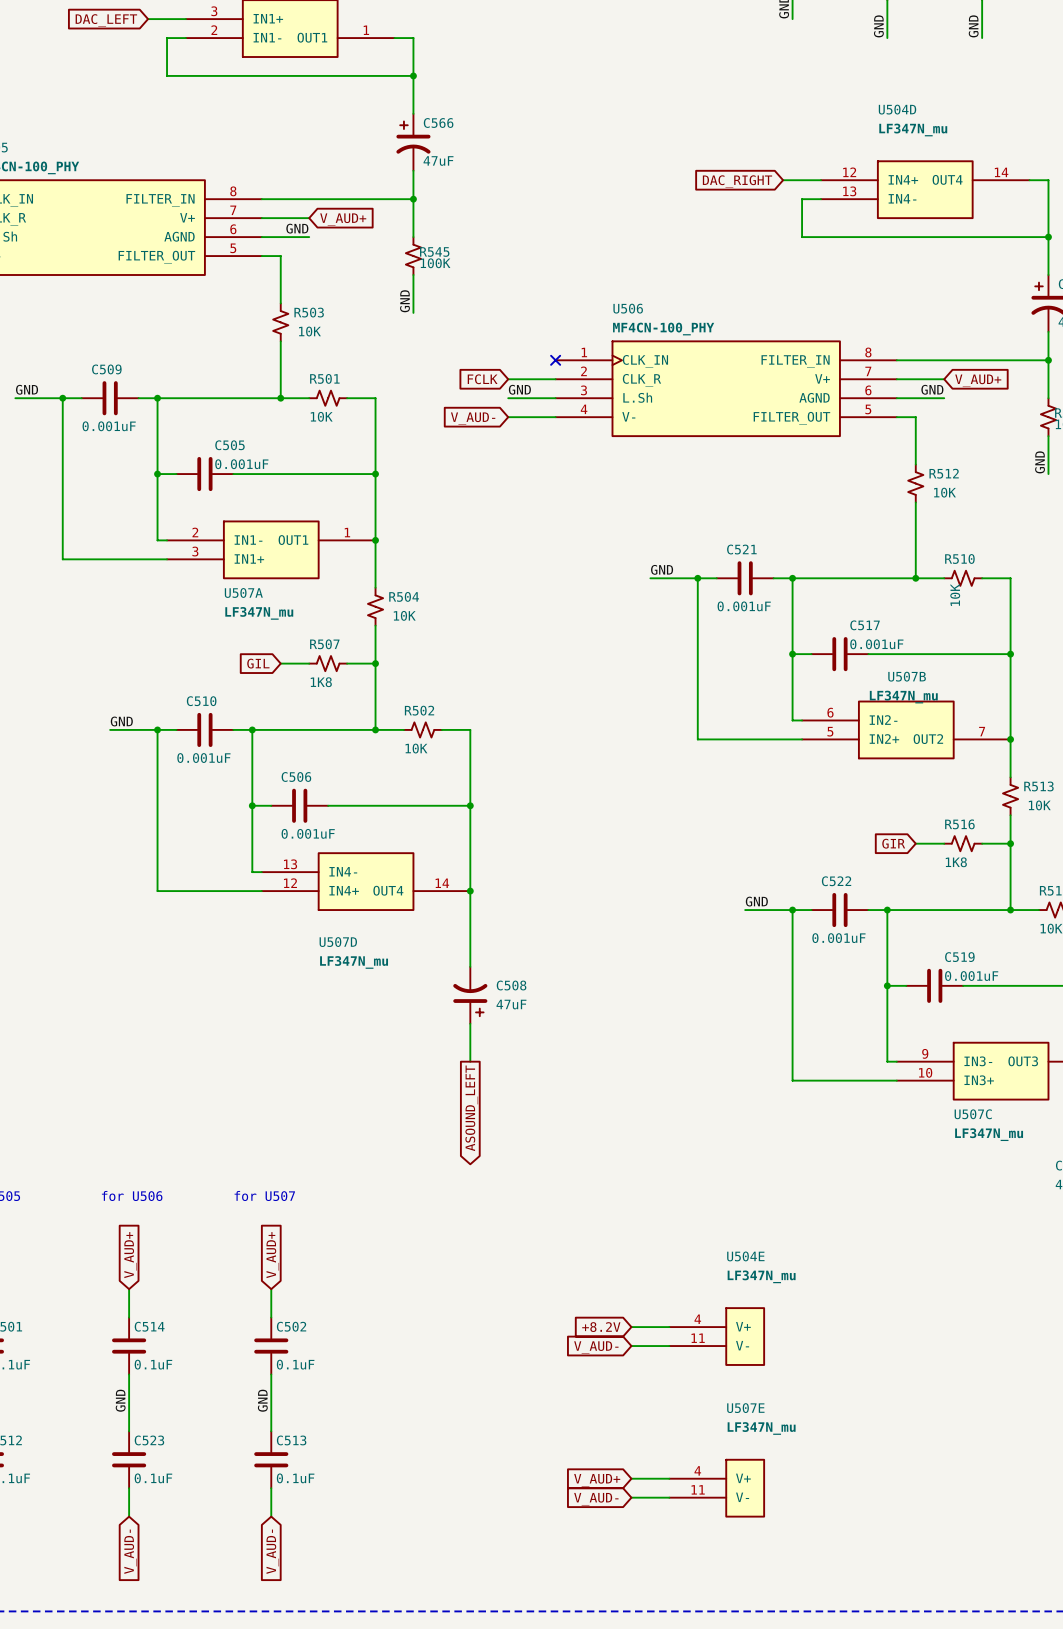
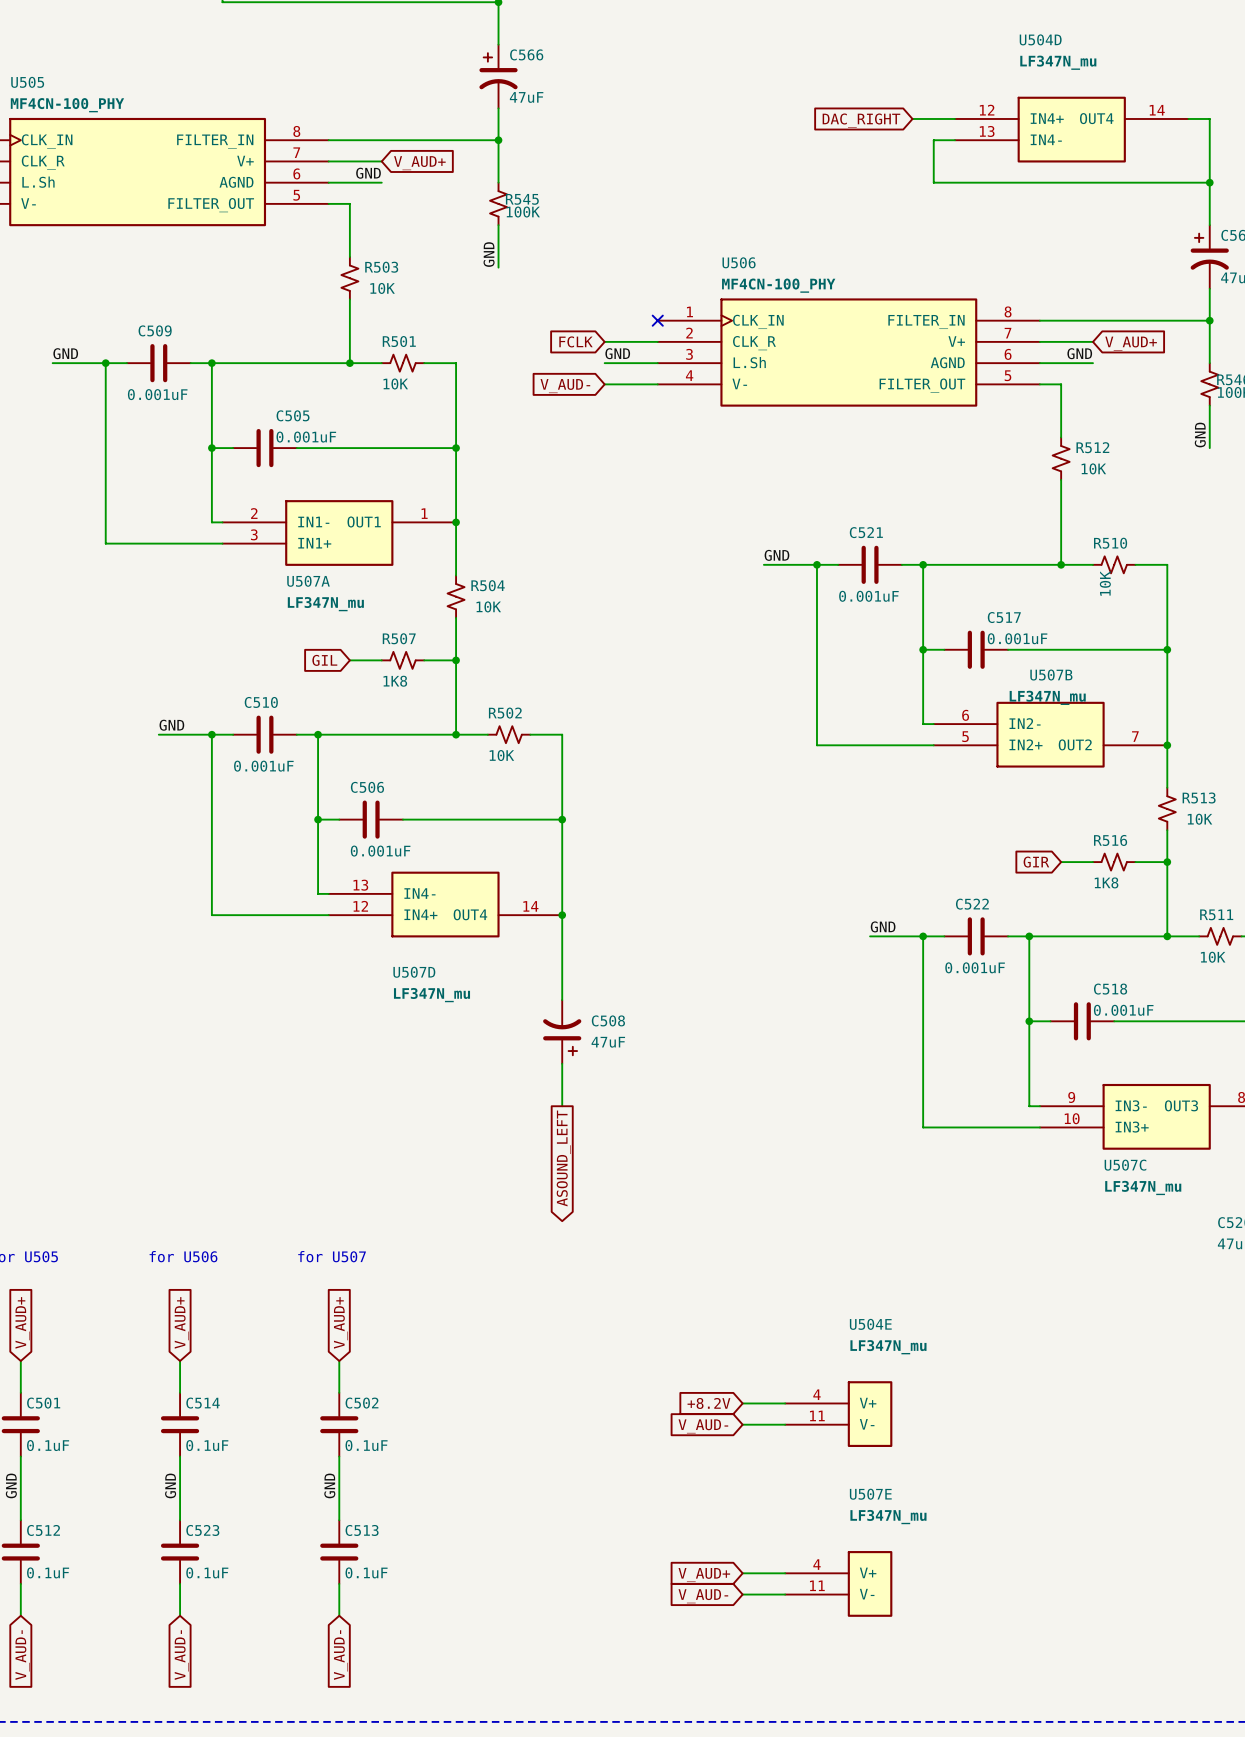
C519 name: C519 (959, 957) -> C518 (1110, 989)

